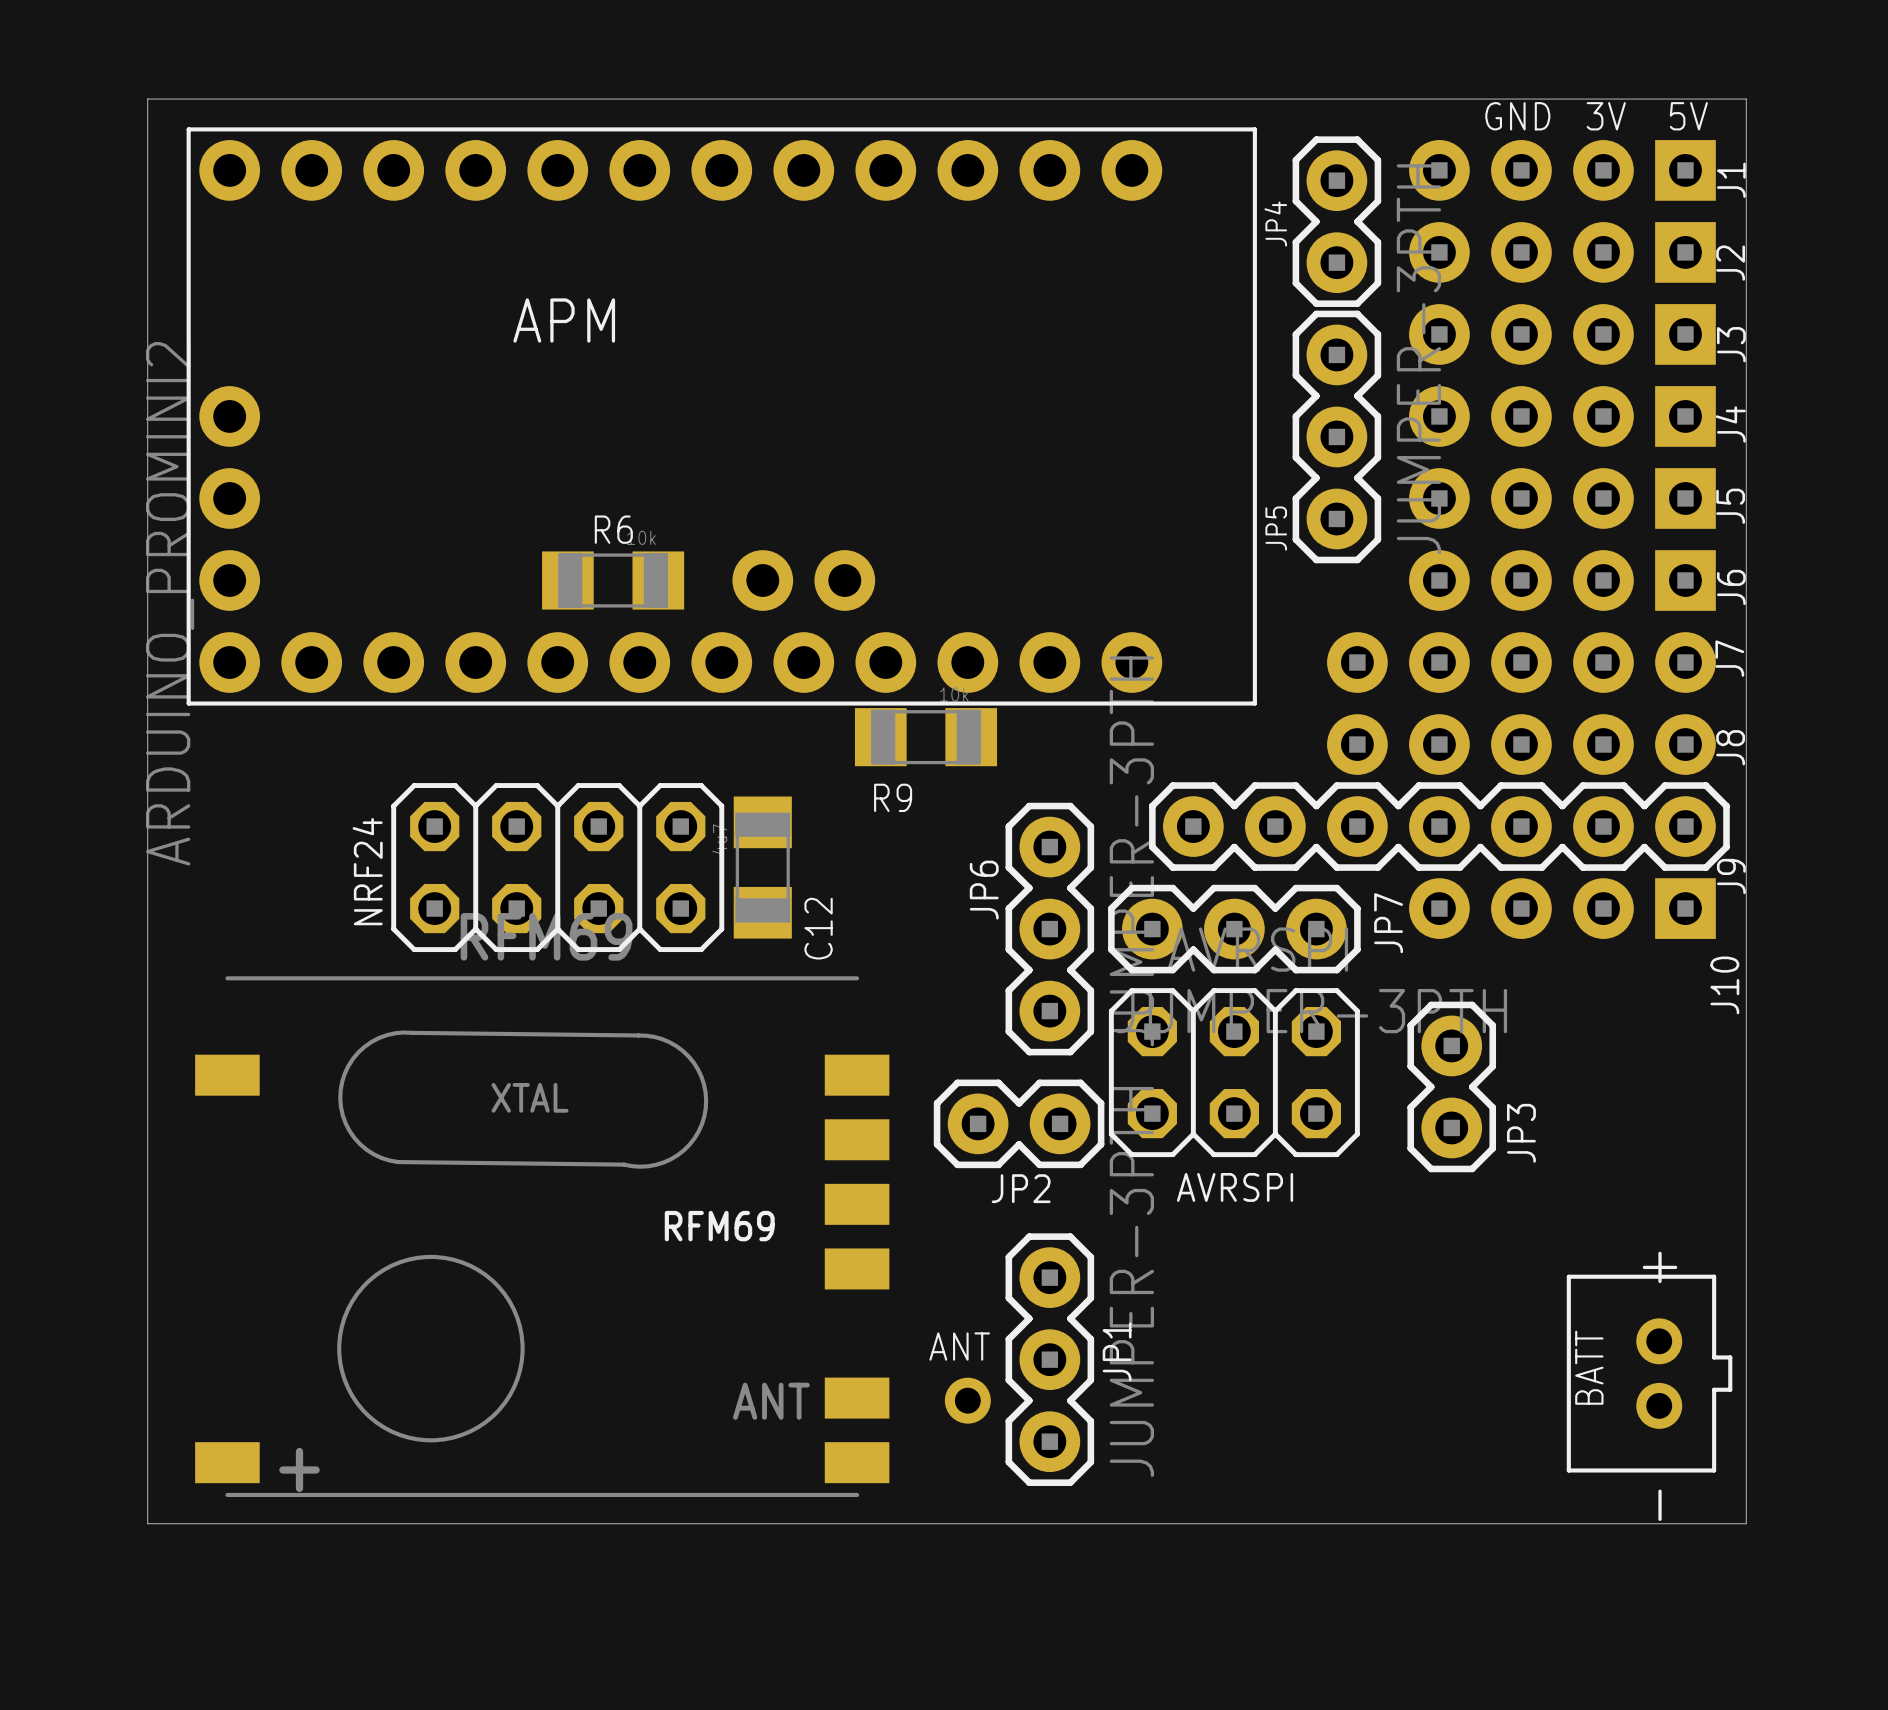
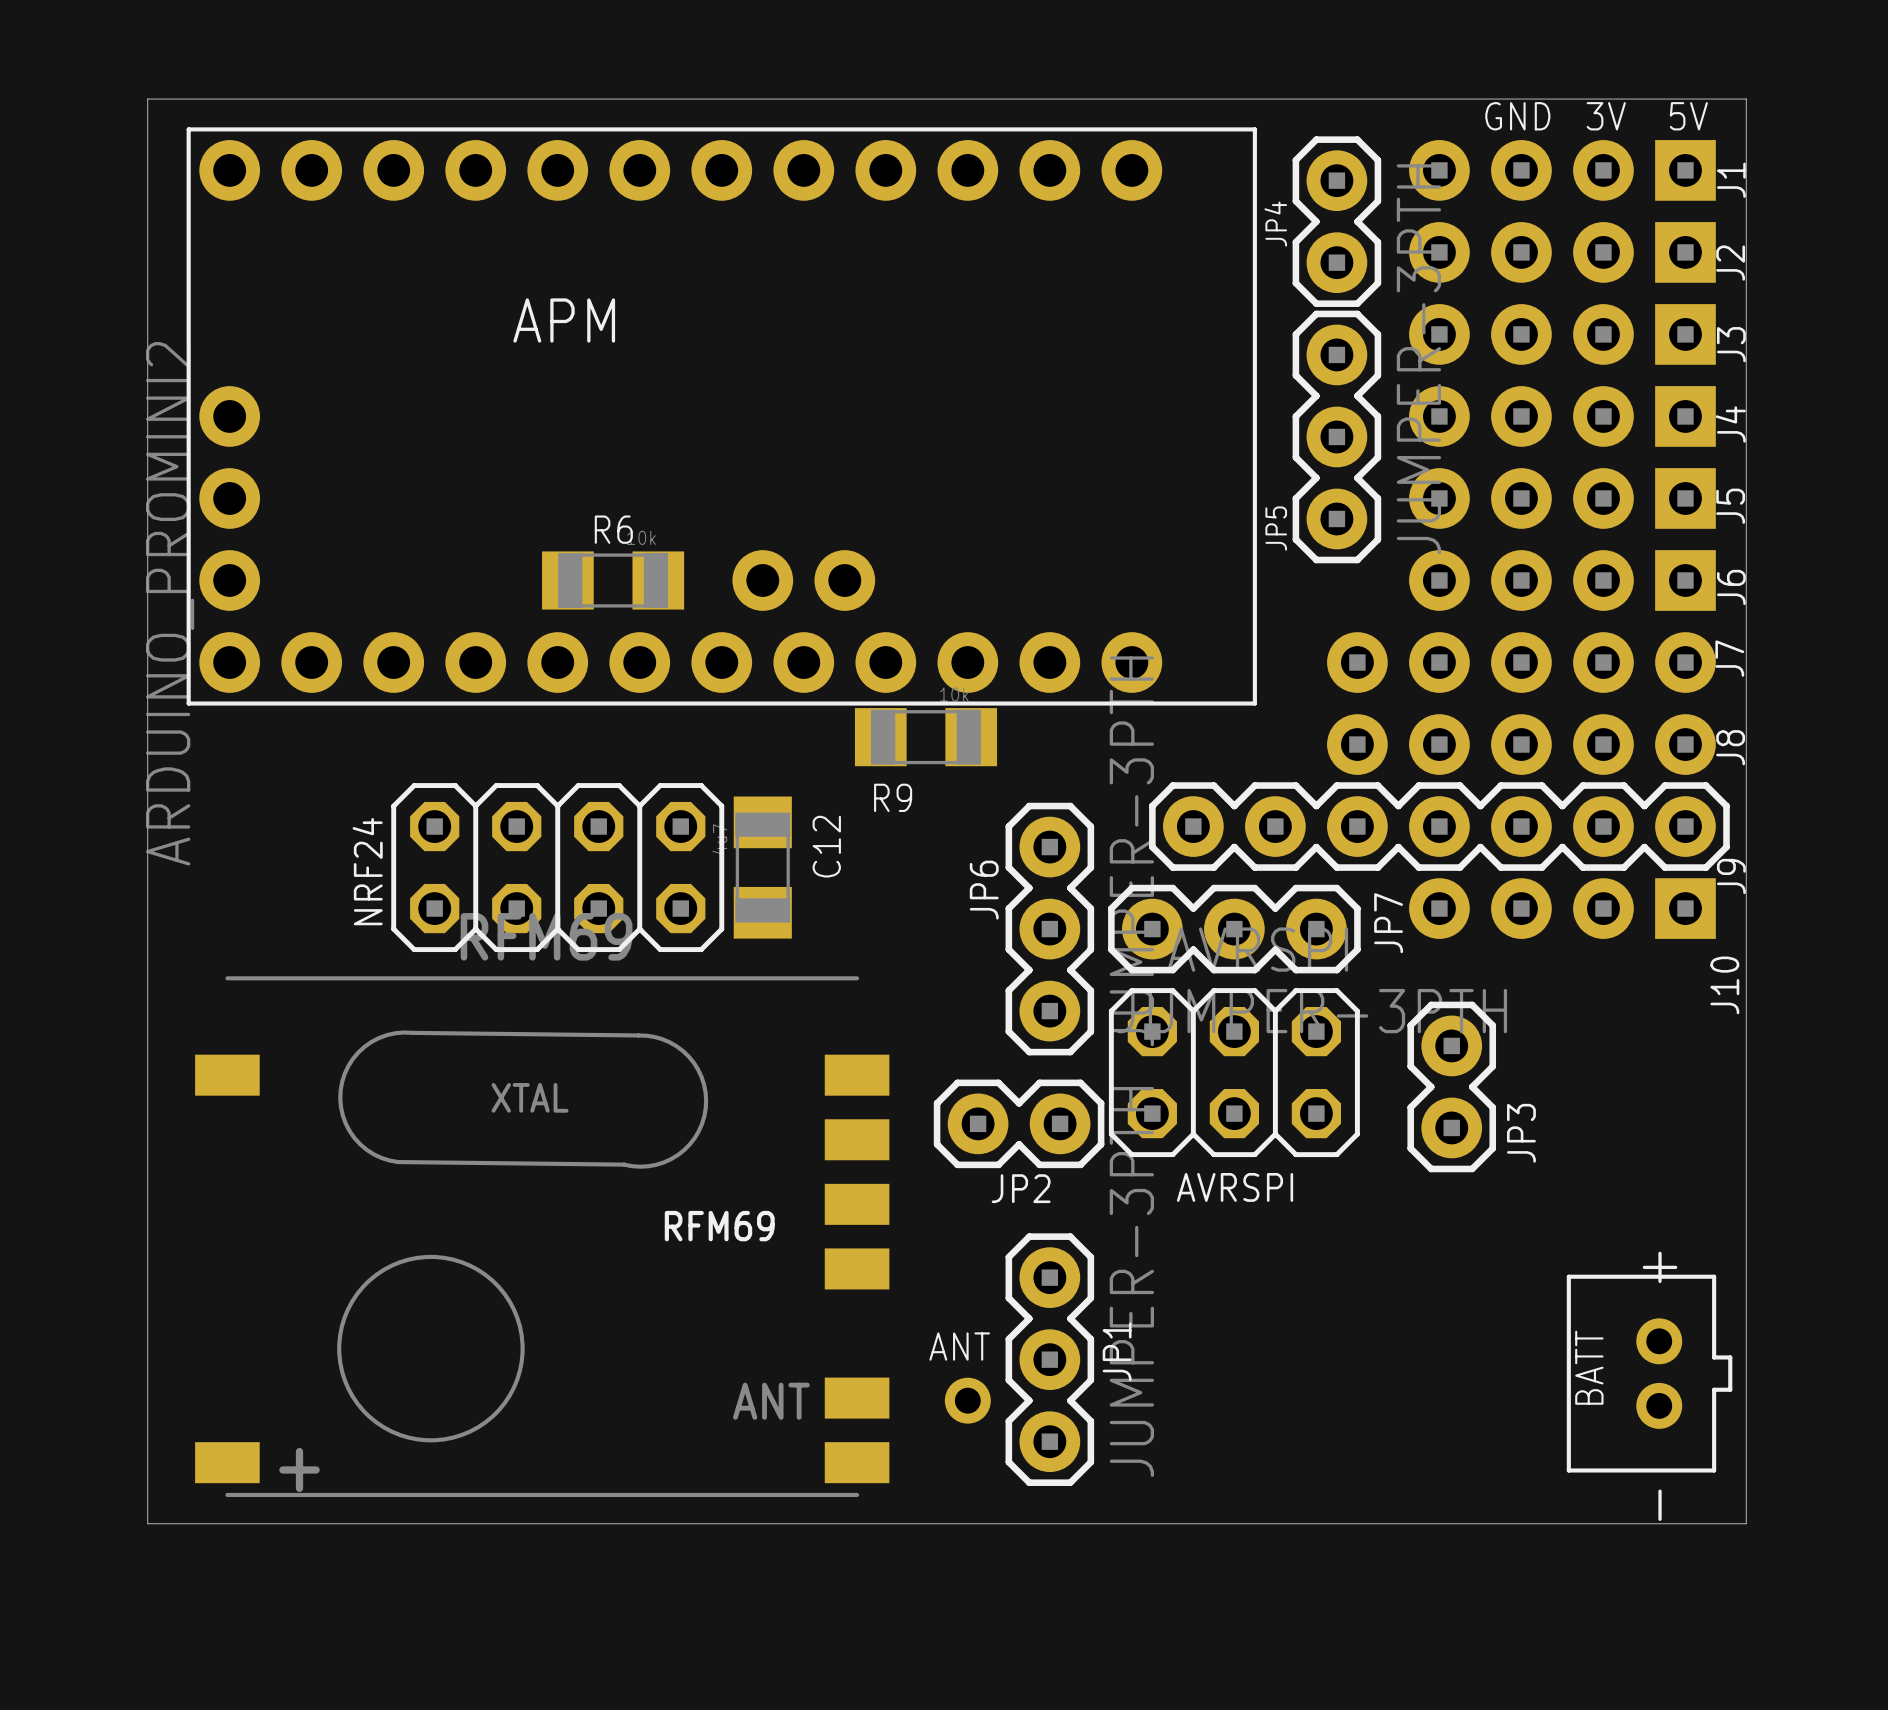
C12 name position: C12 (818, 928) -> C12 (826, 846)

